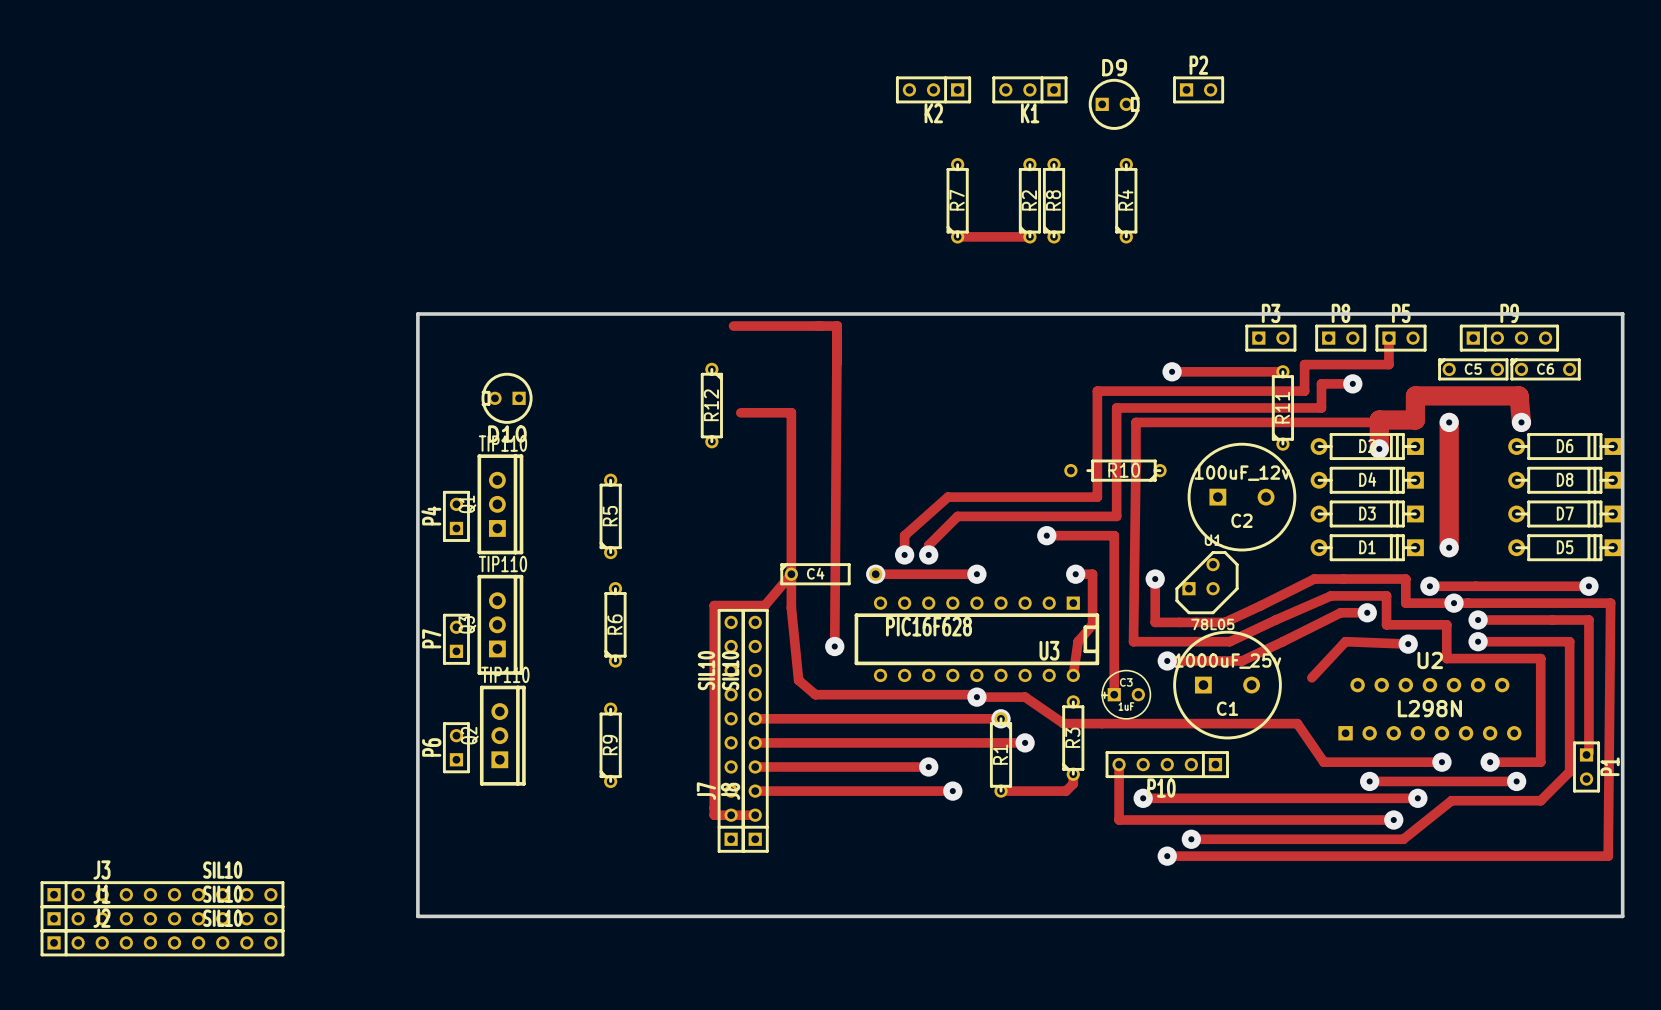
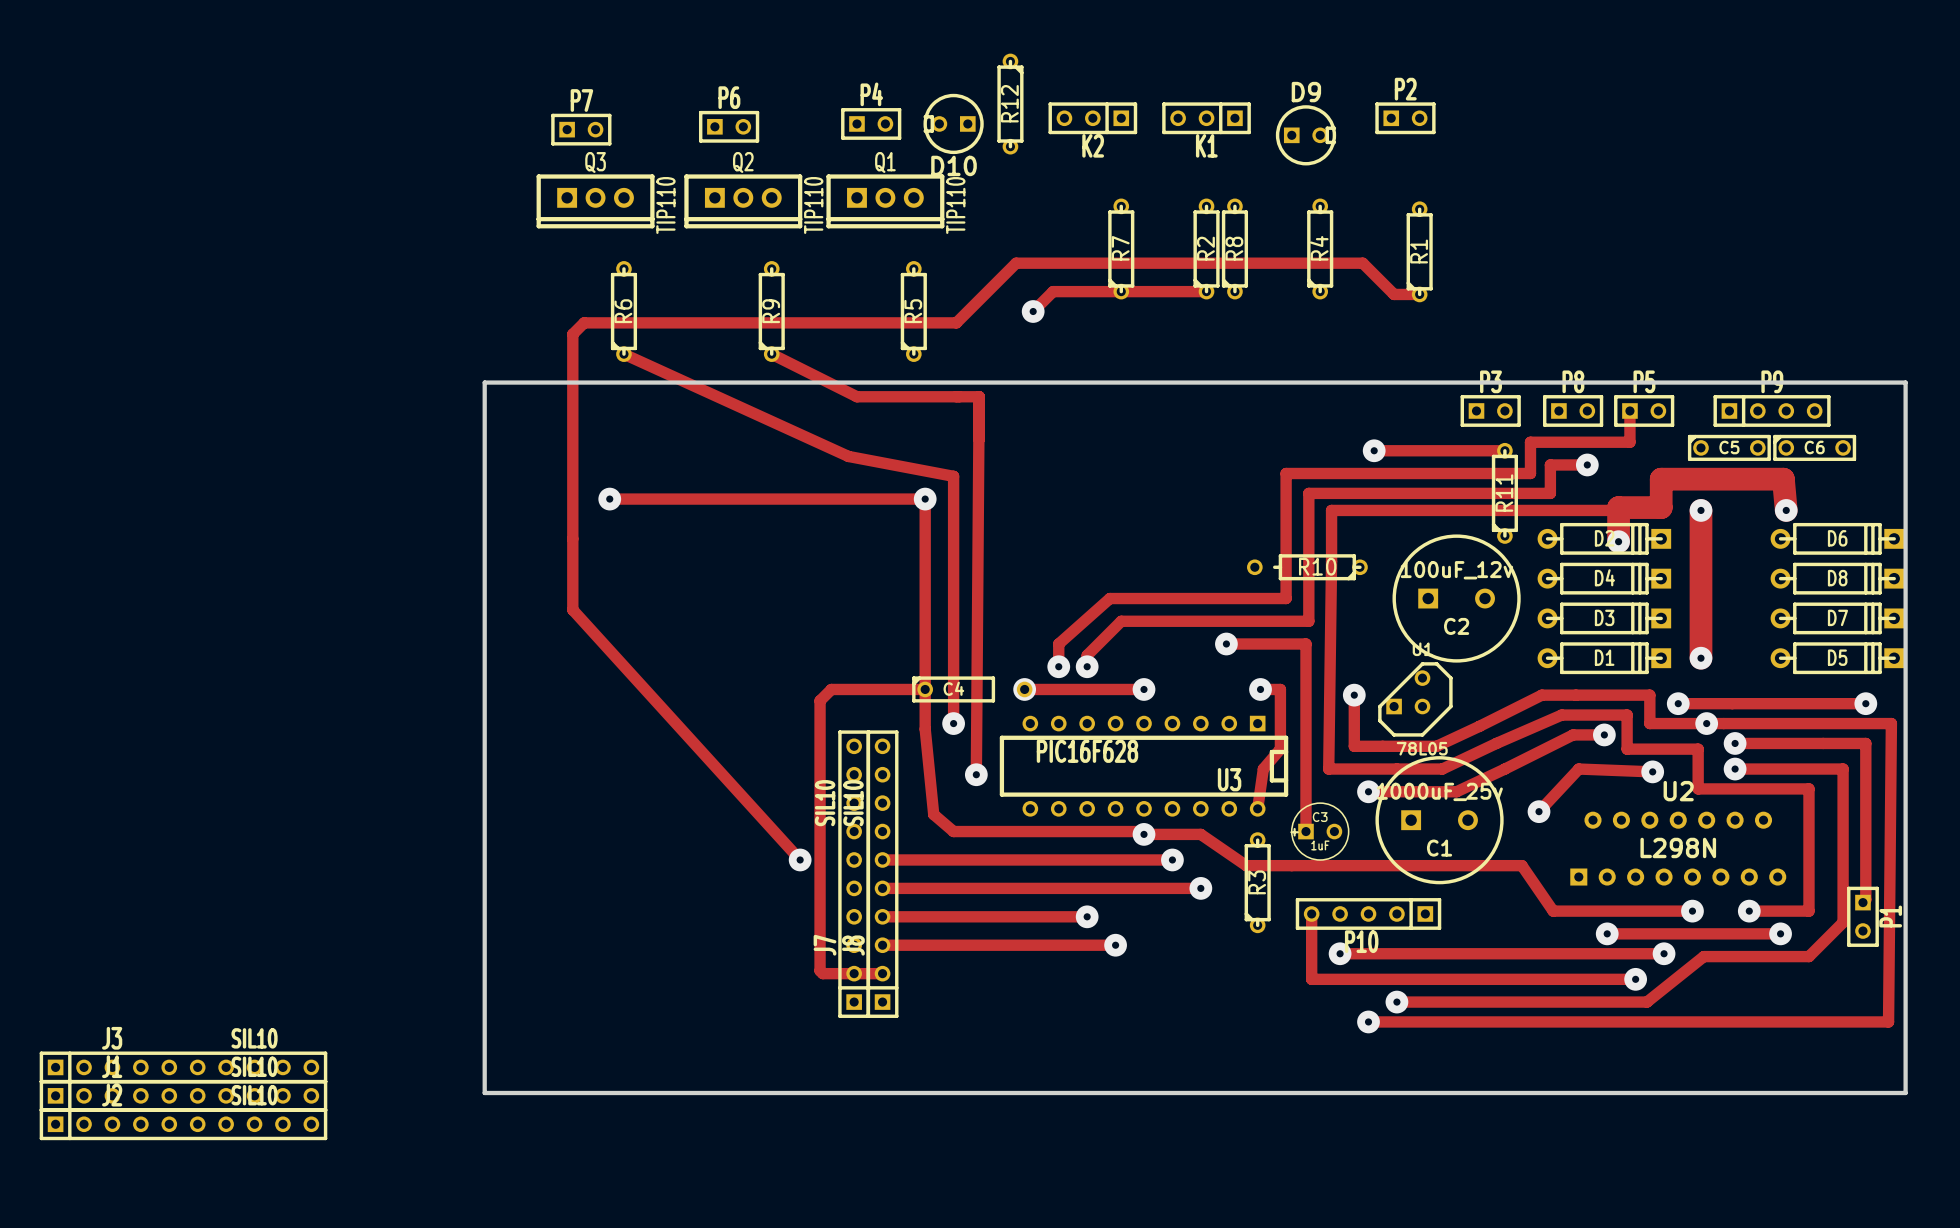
track: none -> (1121, 291) (1053, 291) (1033, 311)
track: none -> (1419, 294) (1394, 294) (1362, 263) (1016, 263) (956, 322) (584, 322) (572, 334) (572, 609) (800, 859)
via: none -> (1033, 311)
track: none -> (623, 354) (848, 456) (953, 476) (953, 723)
track: none -> (771, 354) (856, 396)
D10 position: (507, 398) -> (953, 123)
R12 position: (711, 405) -> (1010, 104)
track: none -> (609, 499) (865, 499)
via: none -> (609, 499)
via: none -> (925, 499)
Q1 rotation: 0° (500, 504) -> 90° clockwise (885, 201)
Q1 position: (500, 504) -> (885, 201)
P4 rotation: 0° (456, 516) -> 90° clockwise (871, 123)
P4 position: (456, 516) -> (871, 123)
R5 position: (610, 516) -> (913, 311)
track: (791, 574) (764, 605) (714, 605) (714, 815) -> (925, 689) (831, 689) (820, 700) (820, 970) (822, 973) (834, 973)
via: none -> (953, 723)
Q3 rotation: 0° (500, 624) -> 90° clockwise (595, 201)
Q3 position: (500, 624) -> (595, 201)
R6 position: (615, 624) -> (623, 311)
P7 rotation: 0° (456, 639) -> 90° clockwise (581, 129)
P7 position: (456, 639) -> (581, 129)
via: none -> (1539, 811)
via: none -> (800, 859)
Q2 rotation: 0° (502, 735) -> 90° clockwise (743, 201)
Q2 position: (502, 735) -> (743, 201)
R9 position: (610, 745) -> (771, 311)
P6 rotation: 0° (456, 747) -> 90° clockwise (729, 126)
P6 position: (456, 747) -> (729, 126)
R1 rotation: 0° (1001, 754) -> 180° (1419, 251)
R1 position: (1001, 754) -> (1419, 251)
track: (1073, 774) (1073, 783) (1066, 791) (1001, 791) -> none

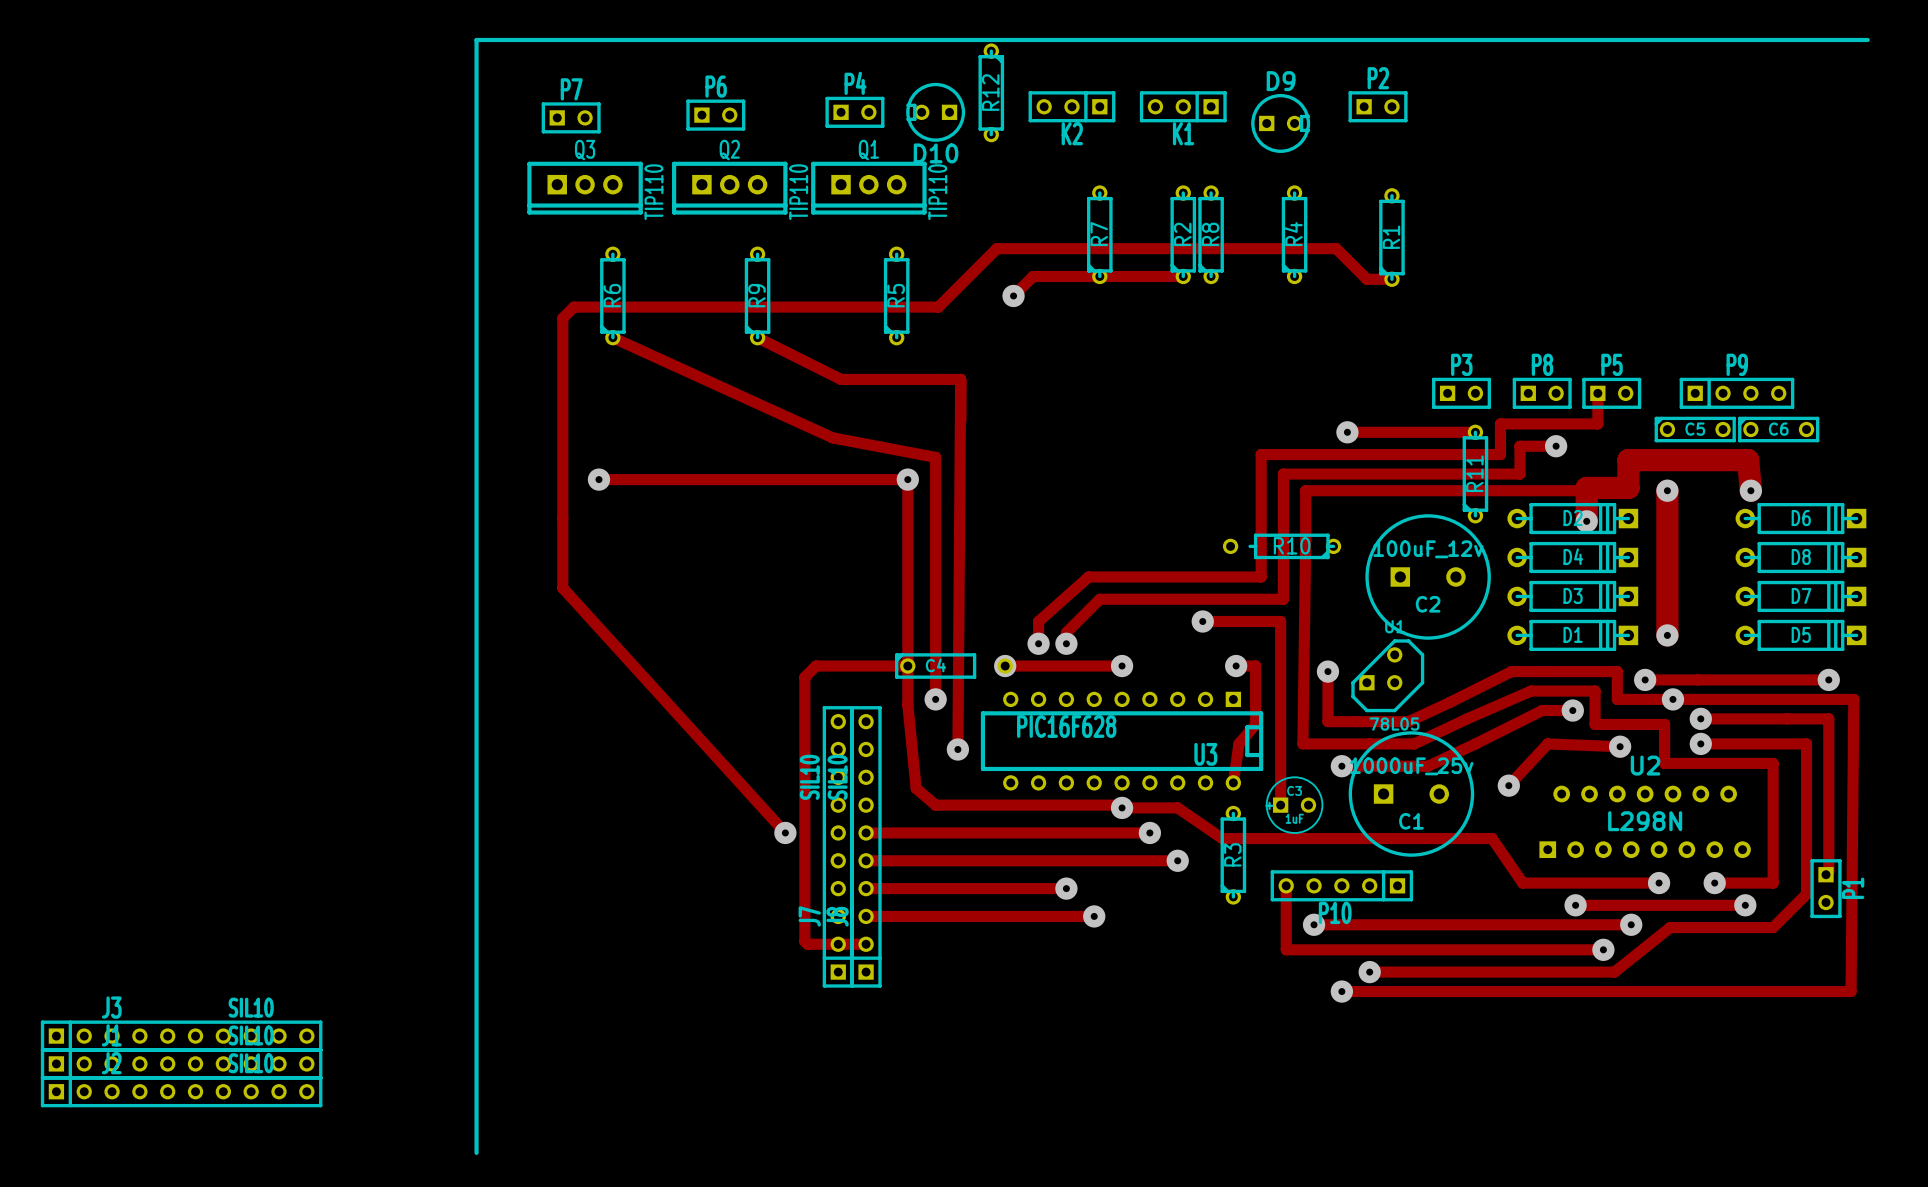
line: none -> (1867, 39) (476, 39) (476, 1152)
board edge: (484, 382) (484, 1093) (1905, 1093) (1905, 382) (484, 382) -> none

